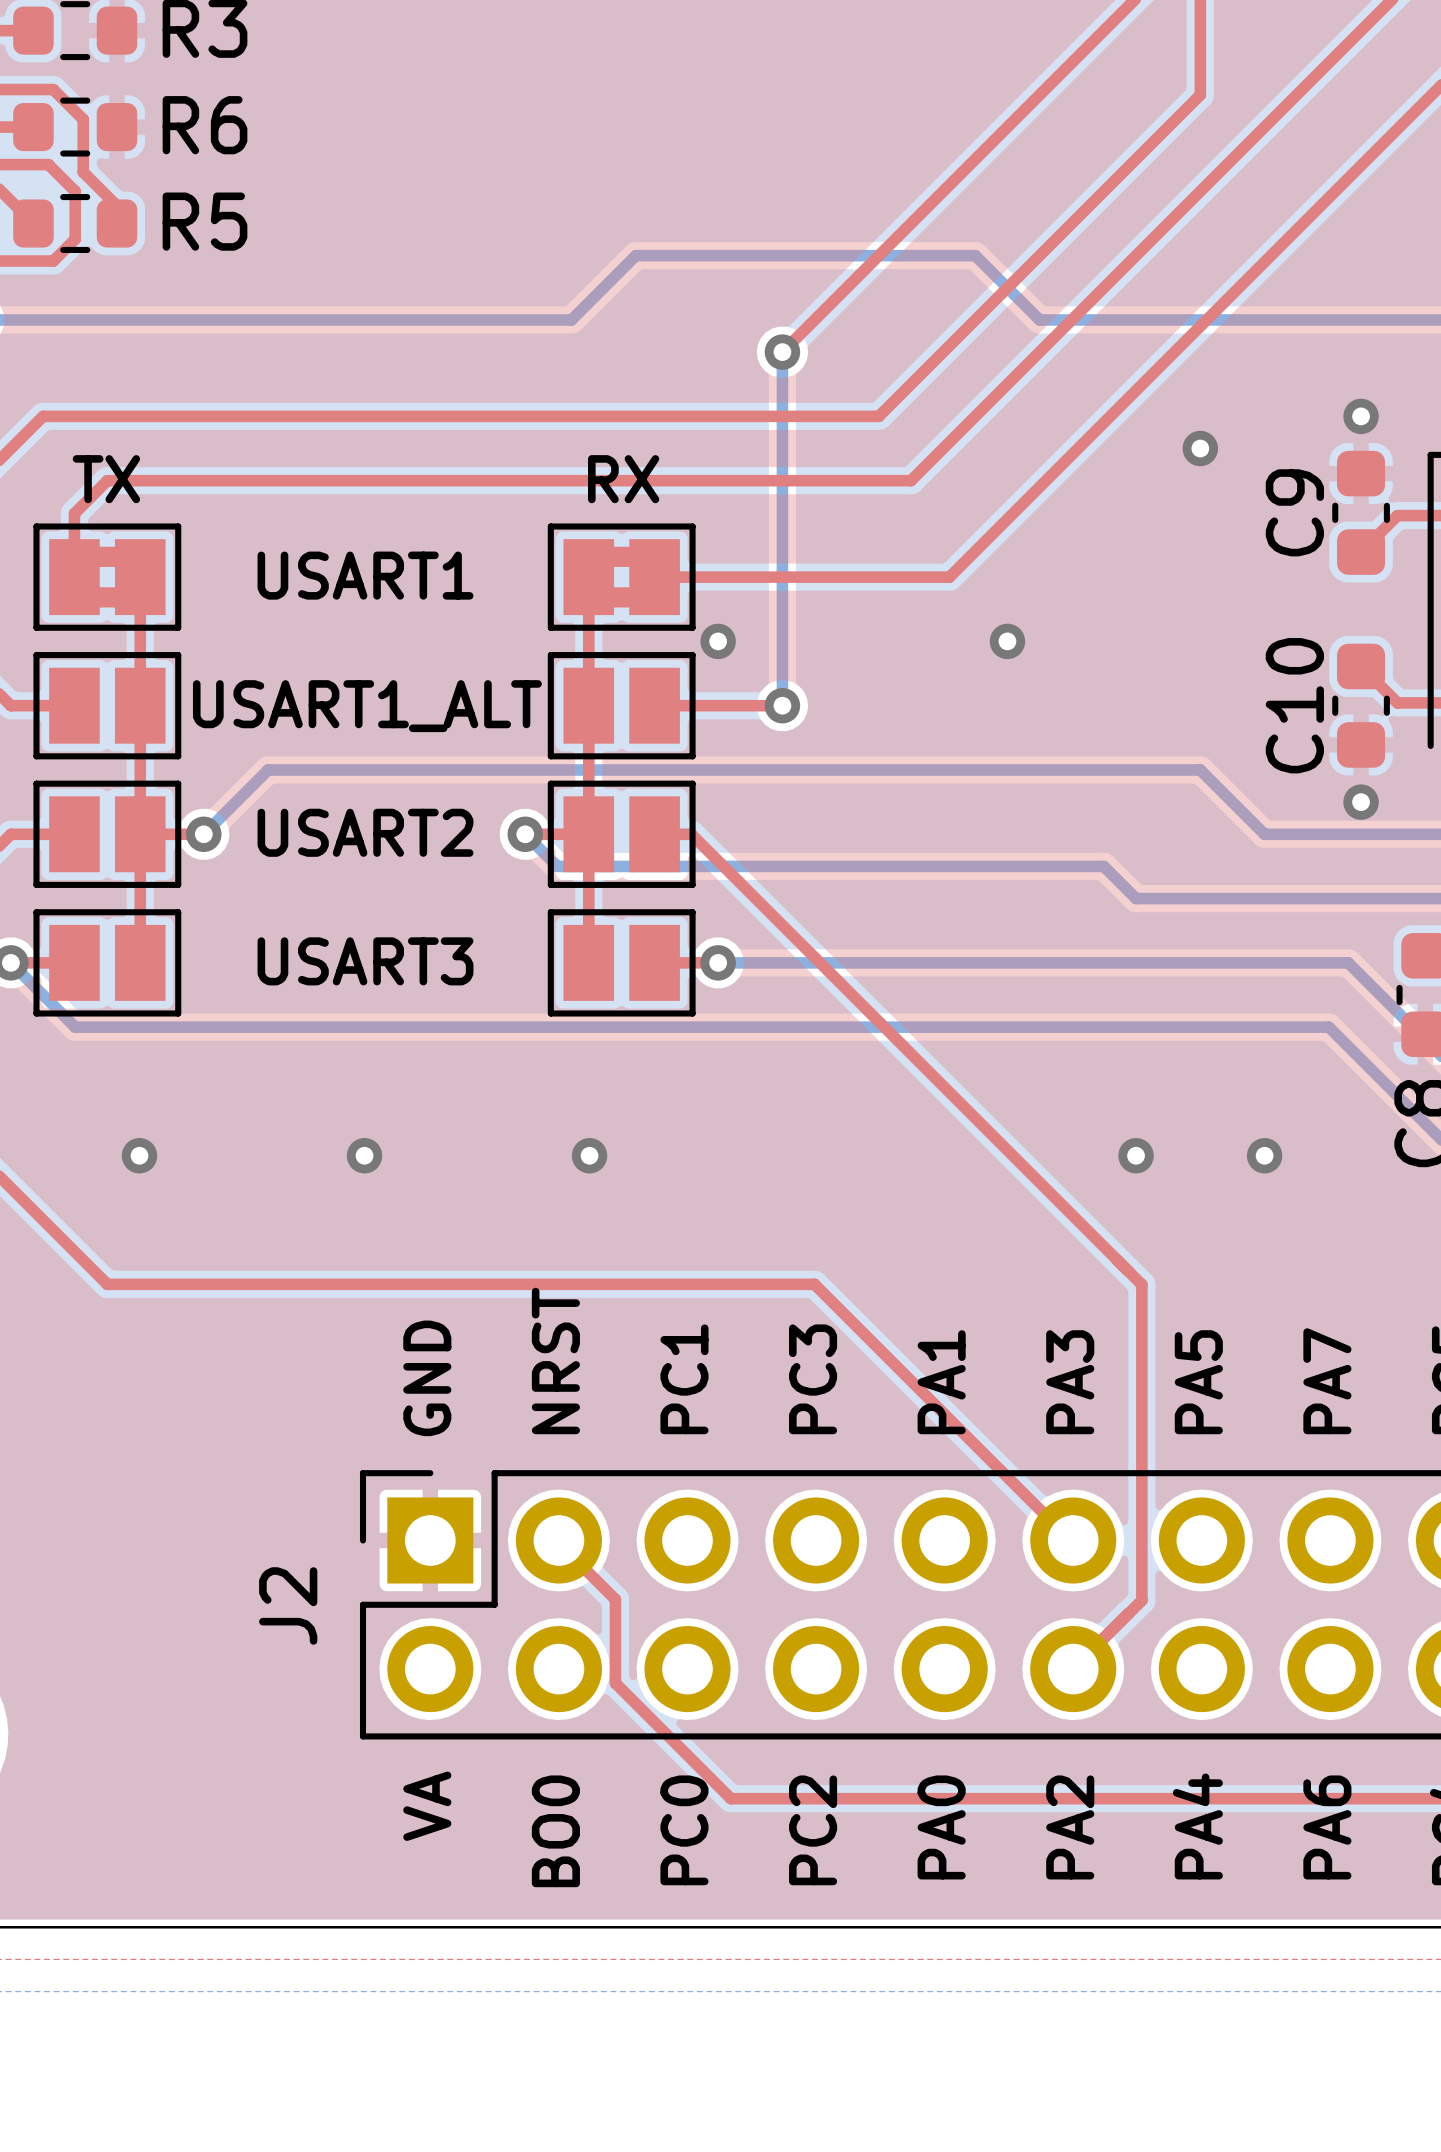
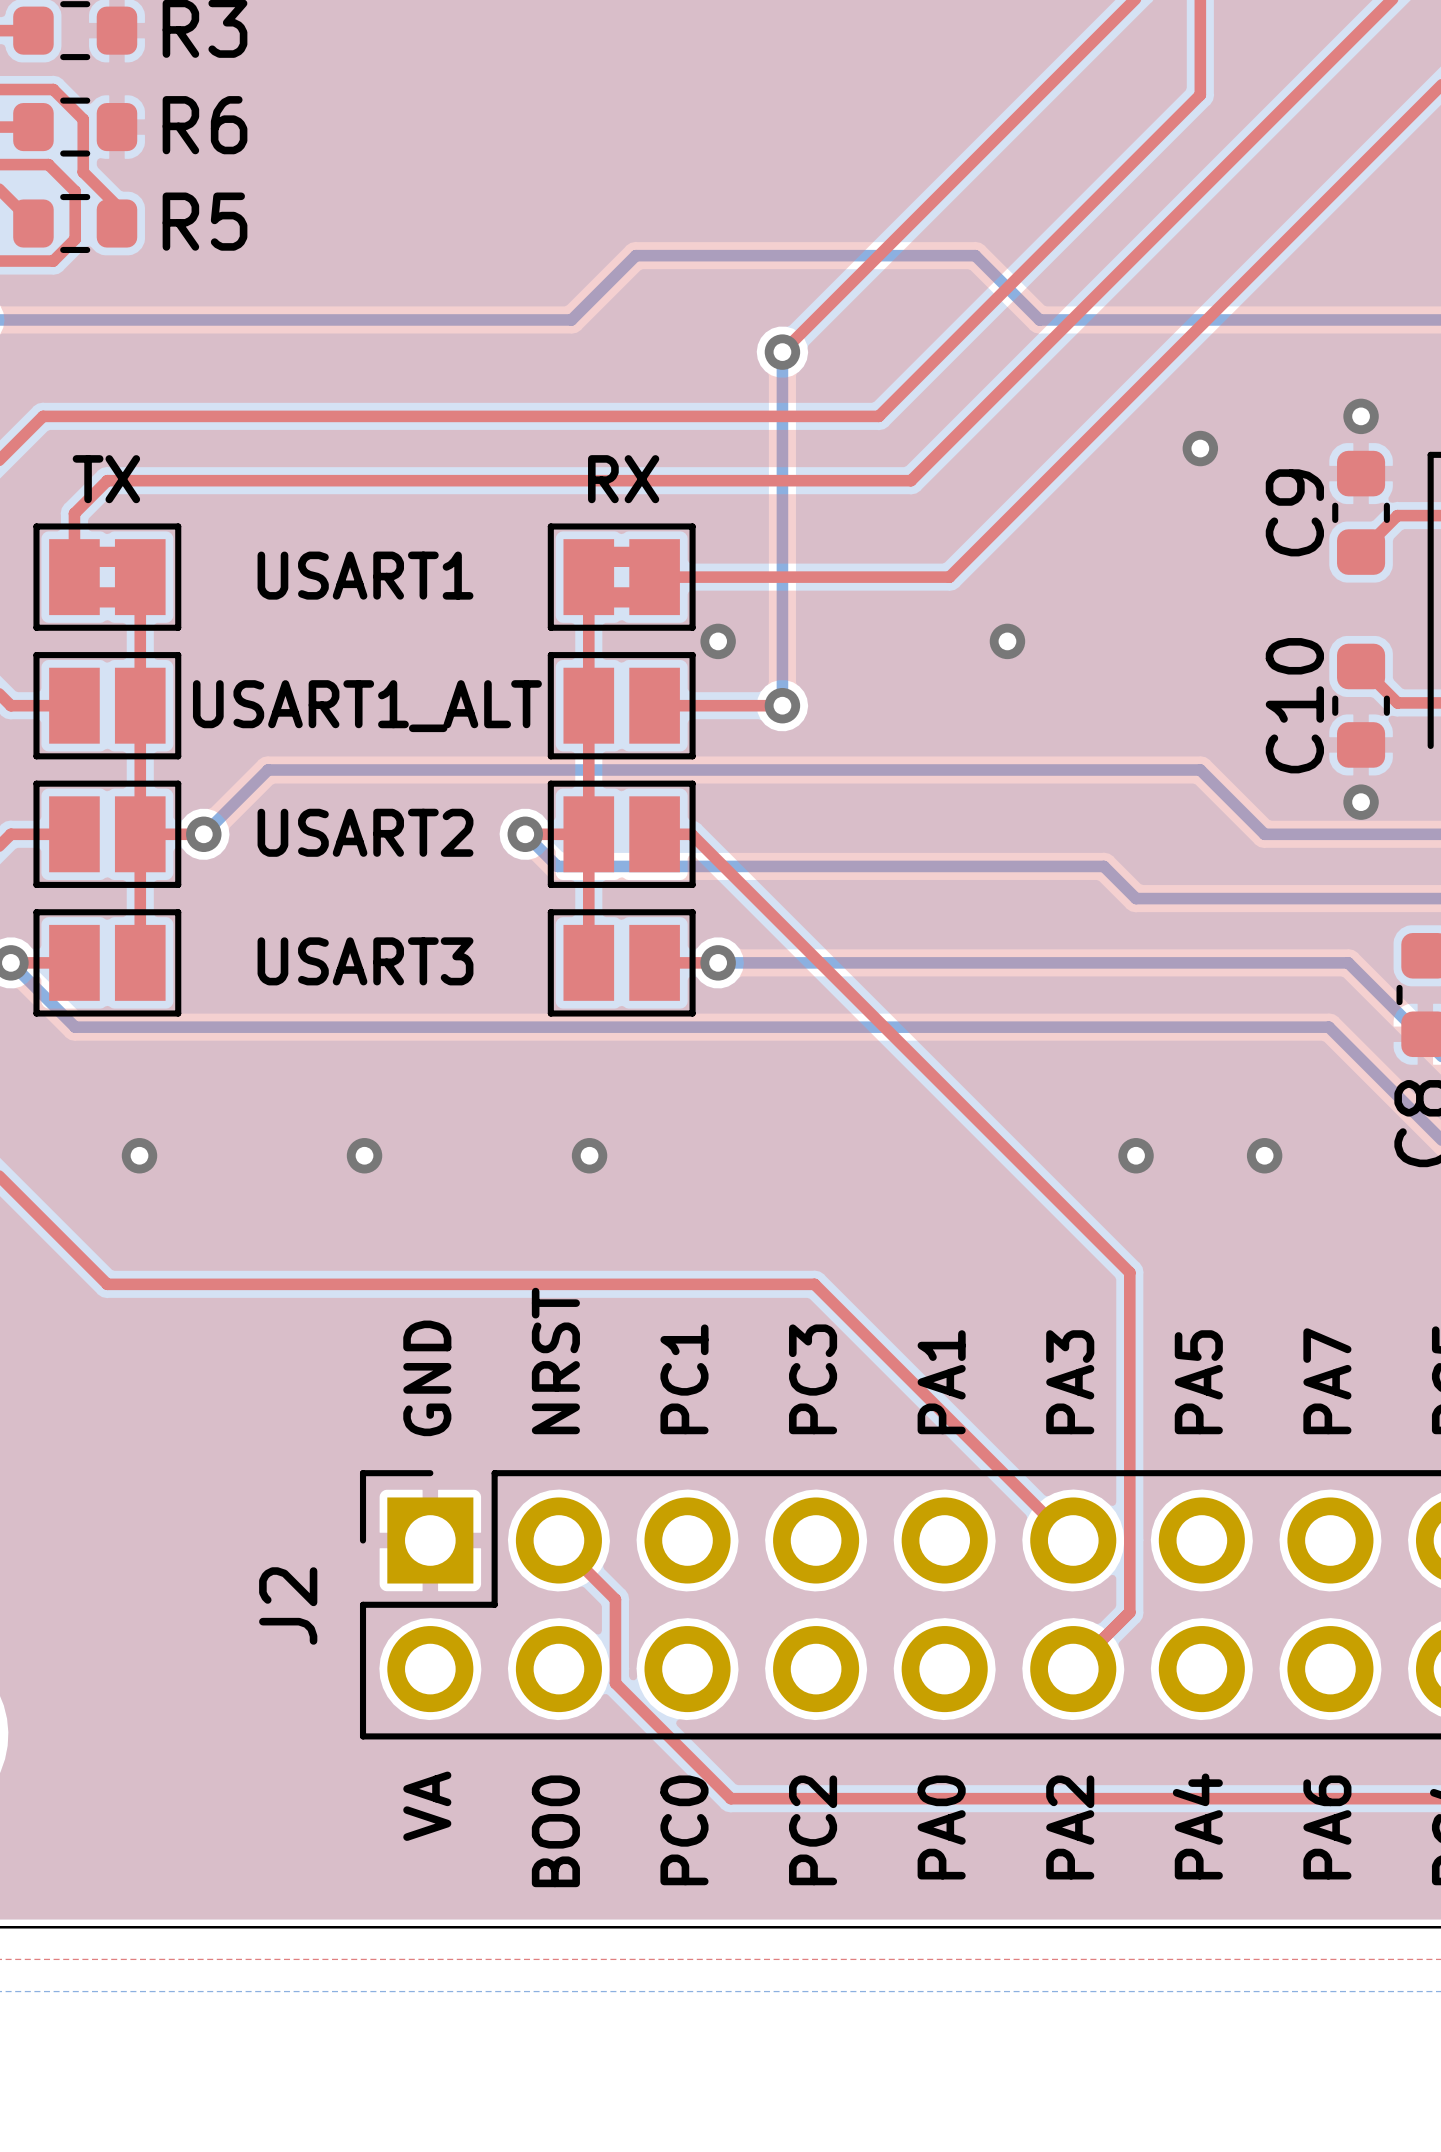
top track: (1129, 1272) (1141, 1284) (1141, 1600) (1129, 1612) -> (1129, 1272) (1129, 1612)

